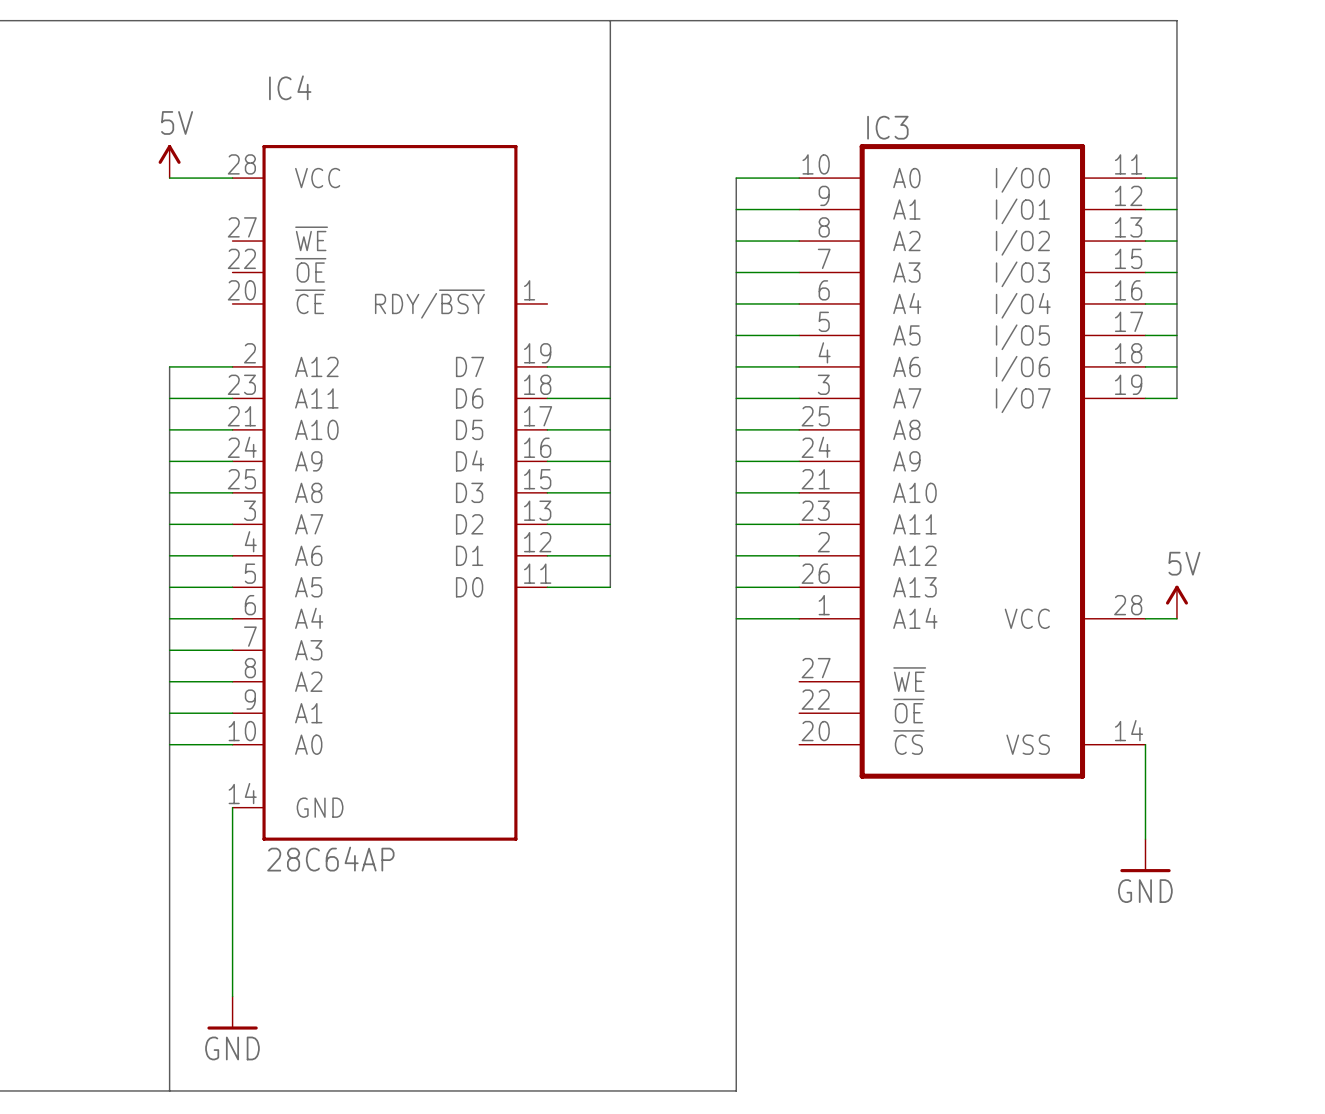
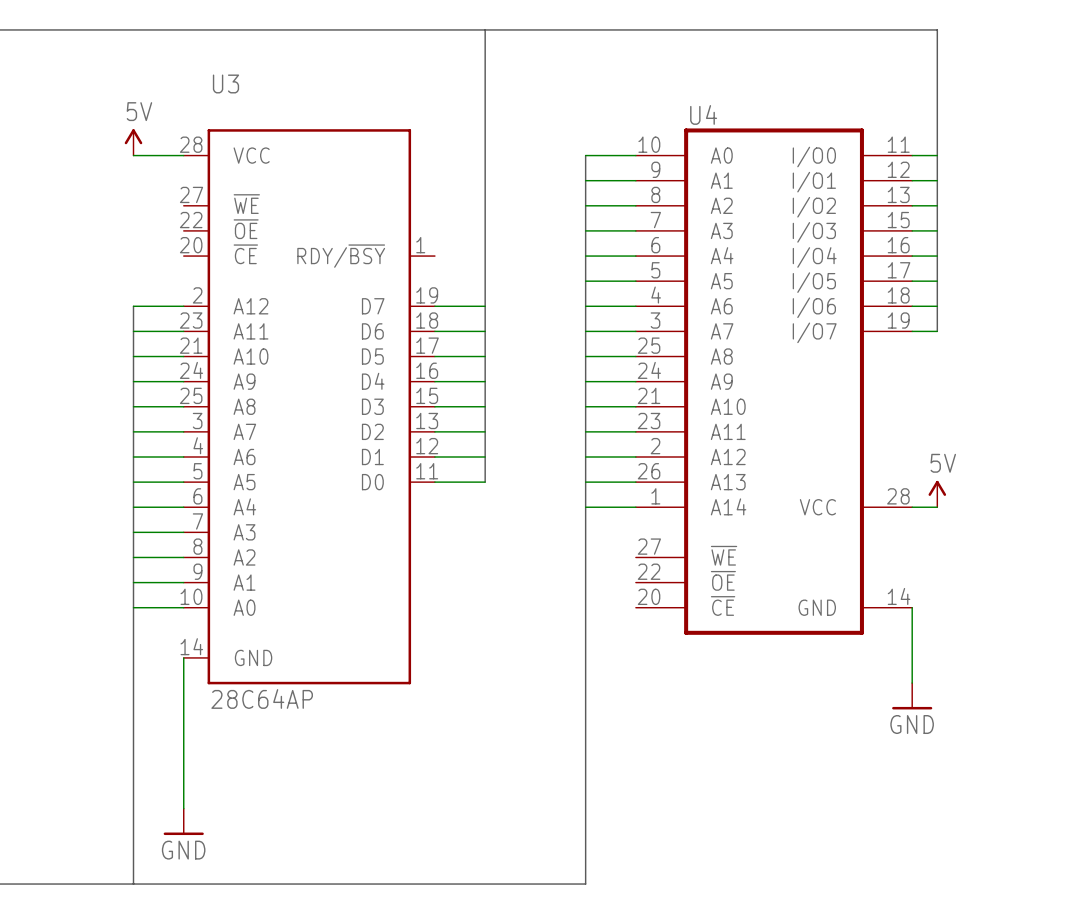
IC4 name: IC4 (290, 87) -> U3 (225, 83)
IC3 name: IC3 (887, 127) -> U4 (703, 114)
IC3 pin name: ~{CS} (908, 742) -> ~{CE} (723, 605)
IC3 pin name: VSS (1028, 744) -> GND (817, 607)

